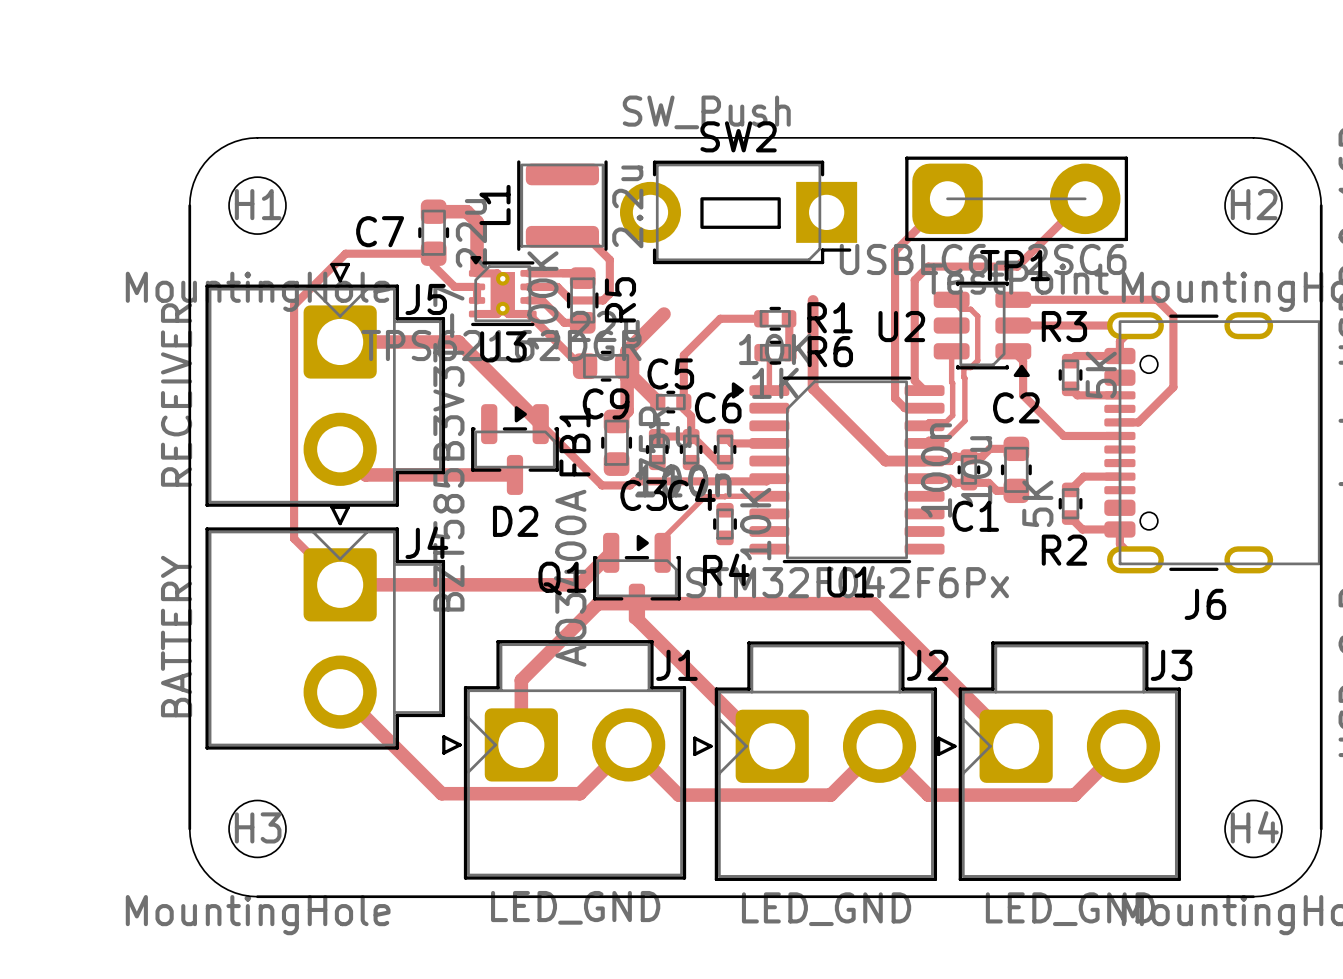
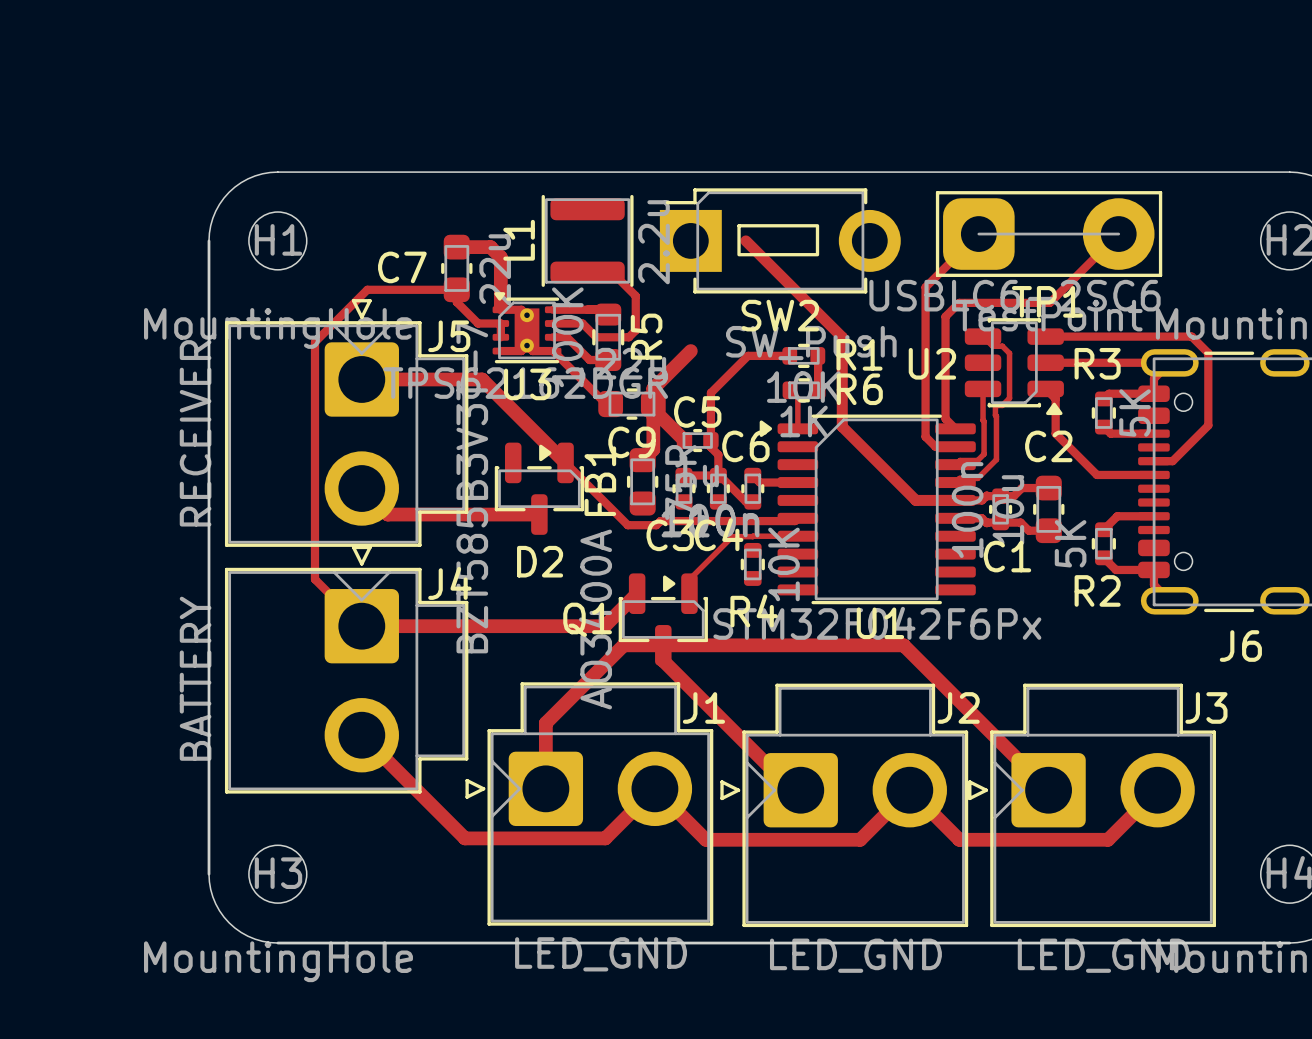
track: none -> (745, 240) (842, 337)
SW2 rotation: 0° (738, 212) -> 180° (780, 240)

